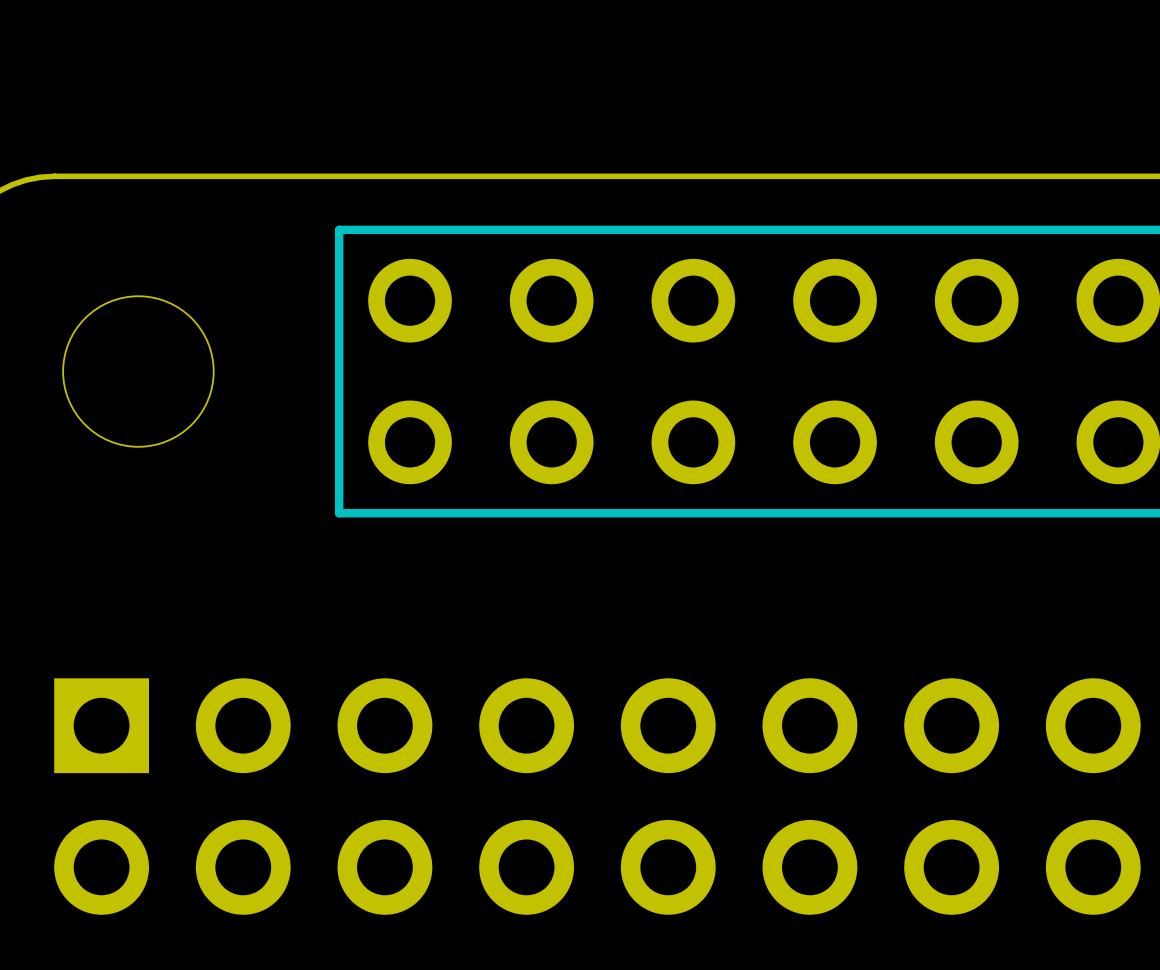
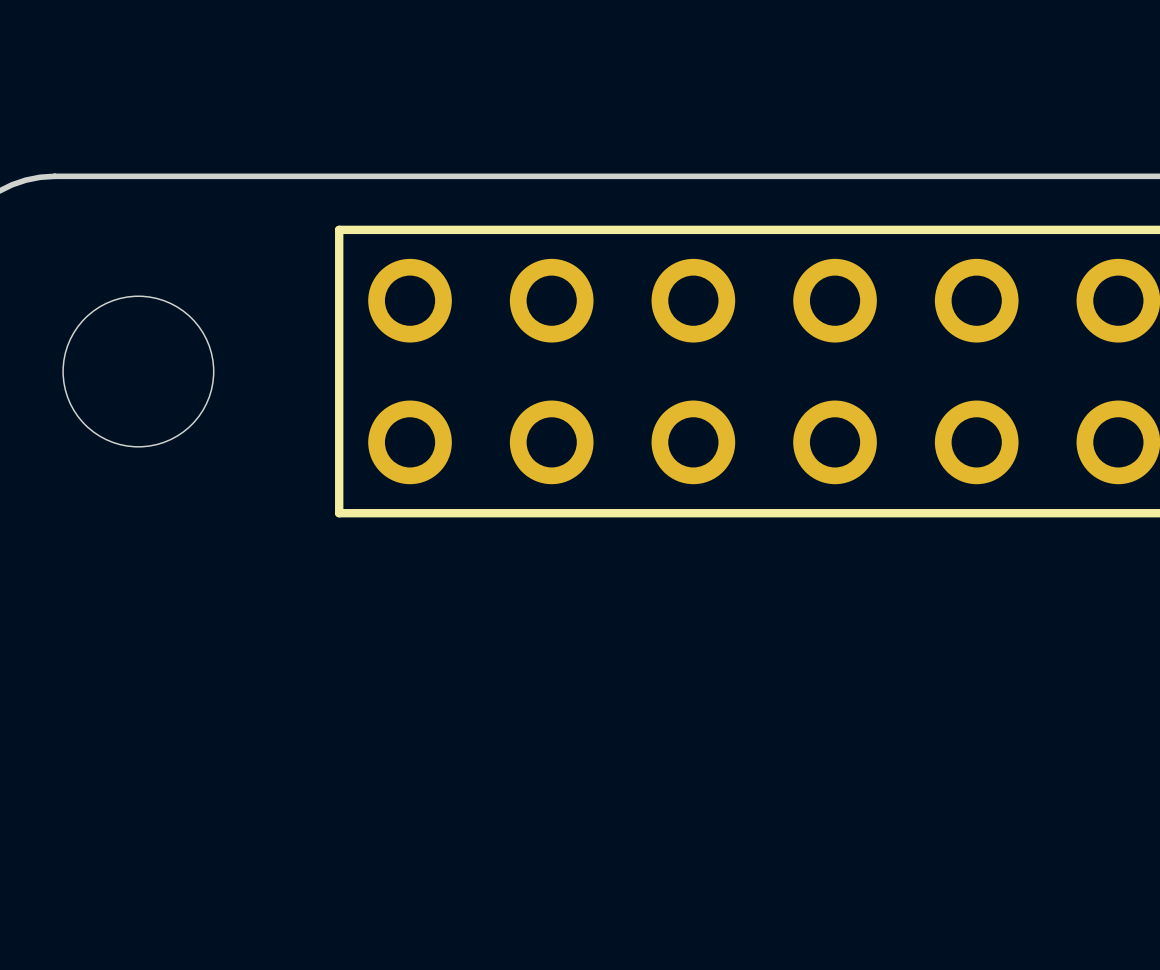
part: (597, 796) -> none

